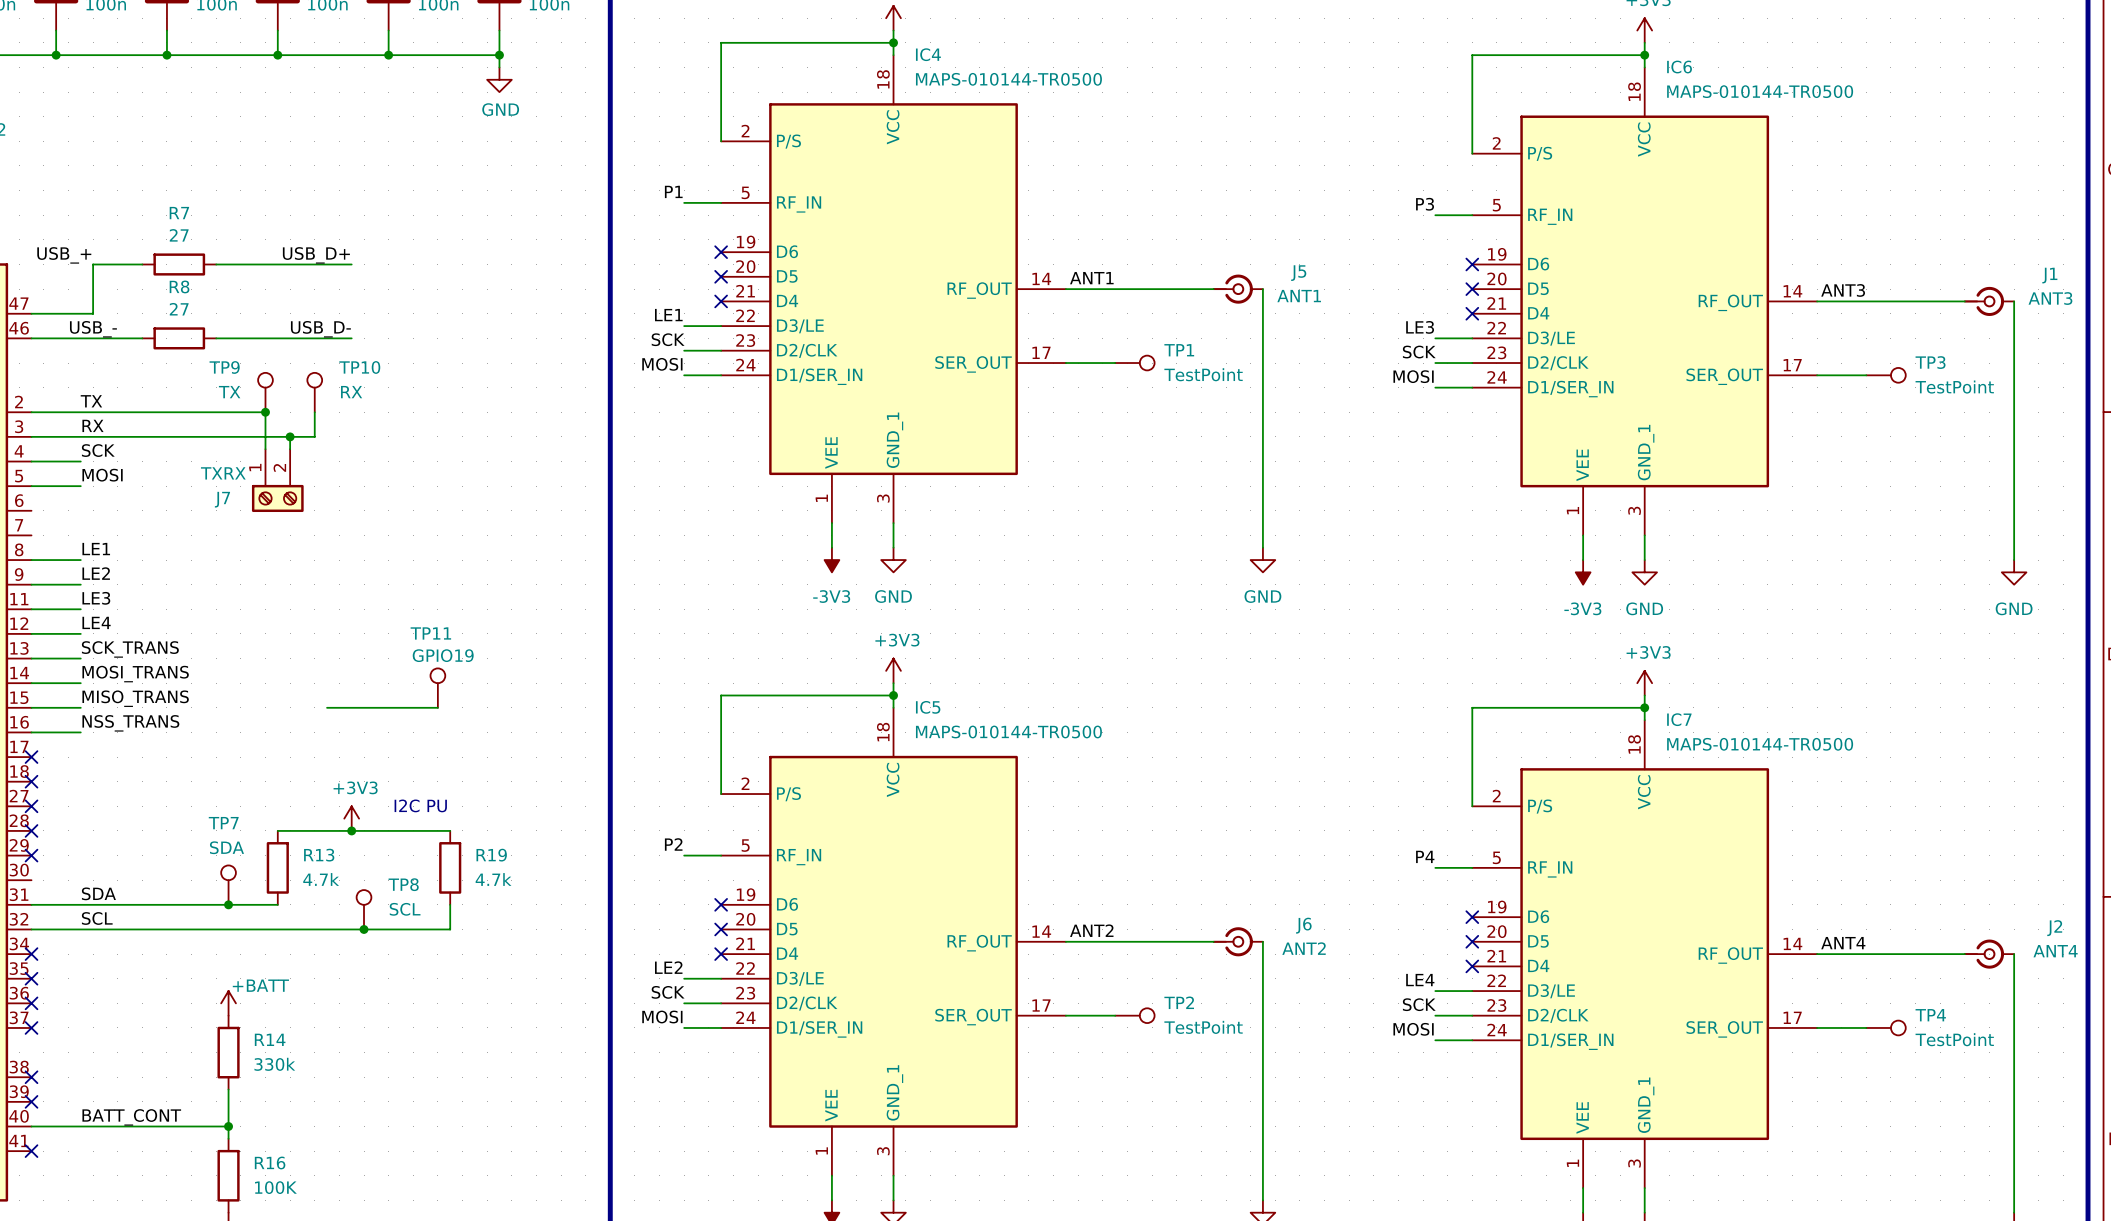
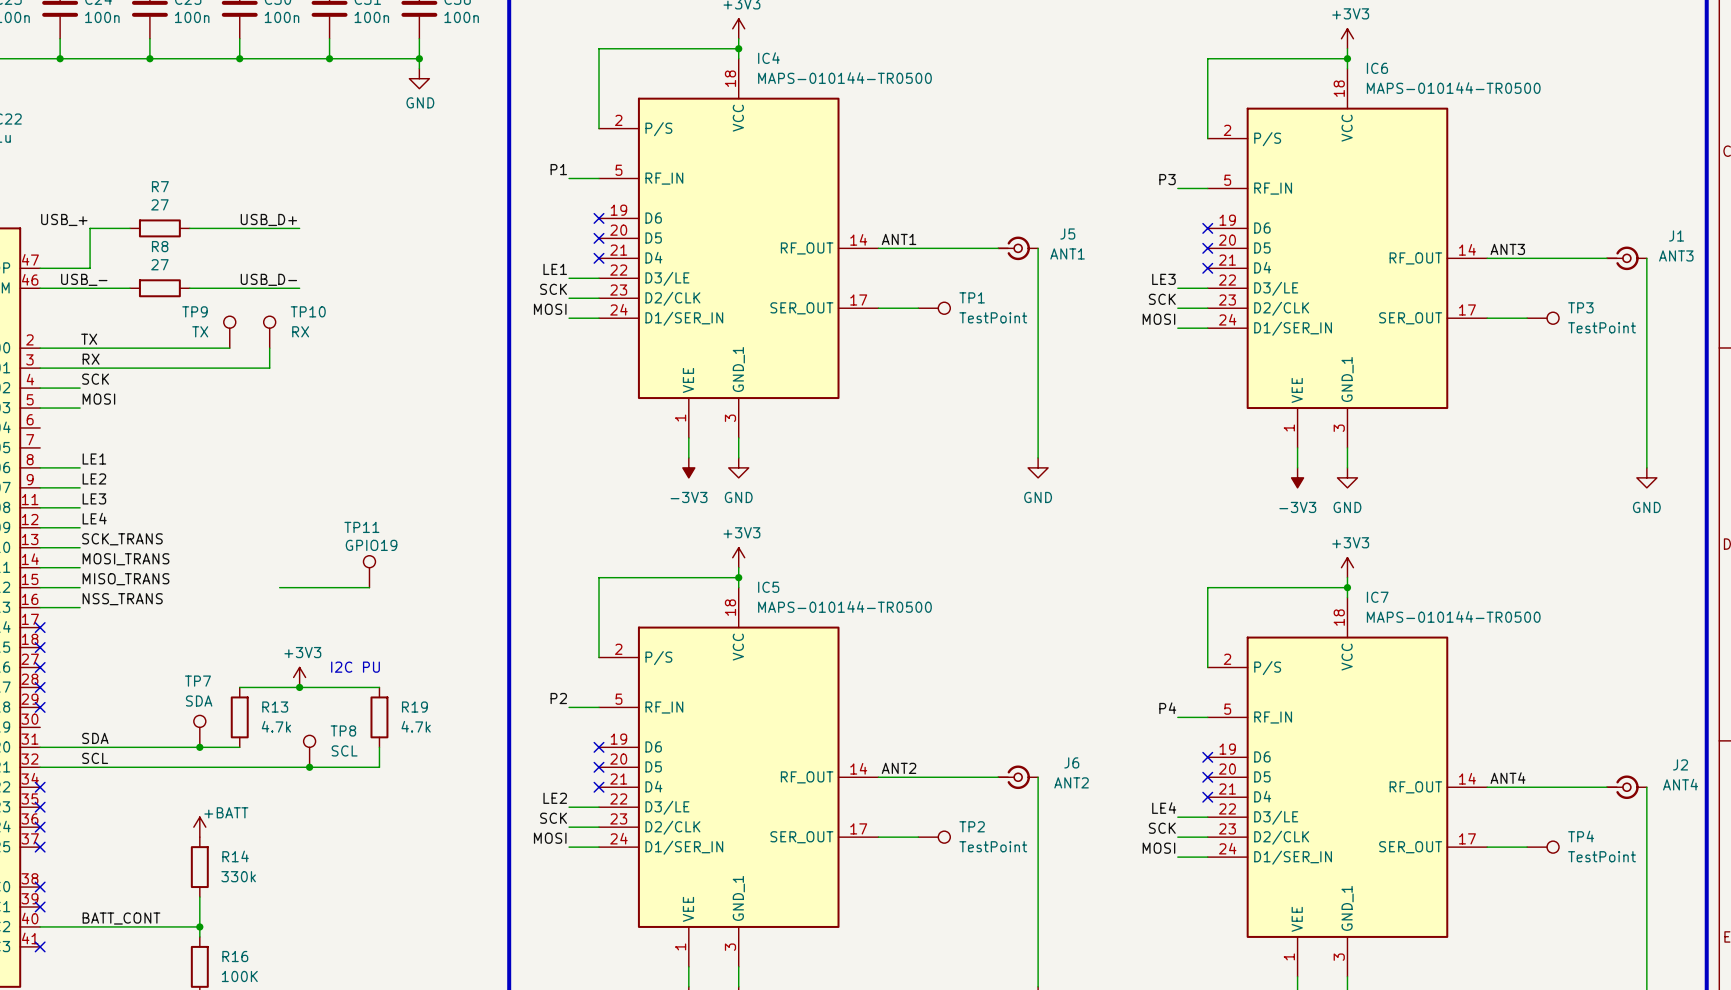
wire: (265, 412) (265, 449) -> none
junction: (265, 412) -> none
wire: (290, 436) (290, 449) -> none
junction: (290, 436) -> none
J7: TXRX (277, 480) -> none

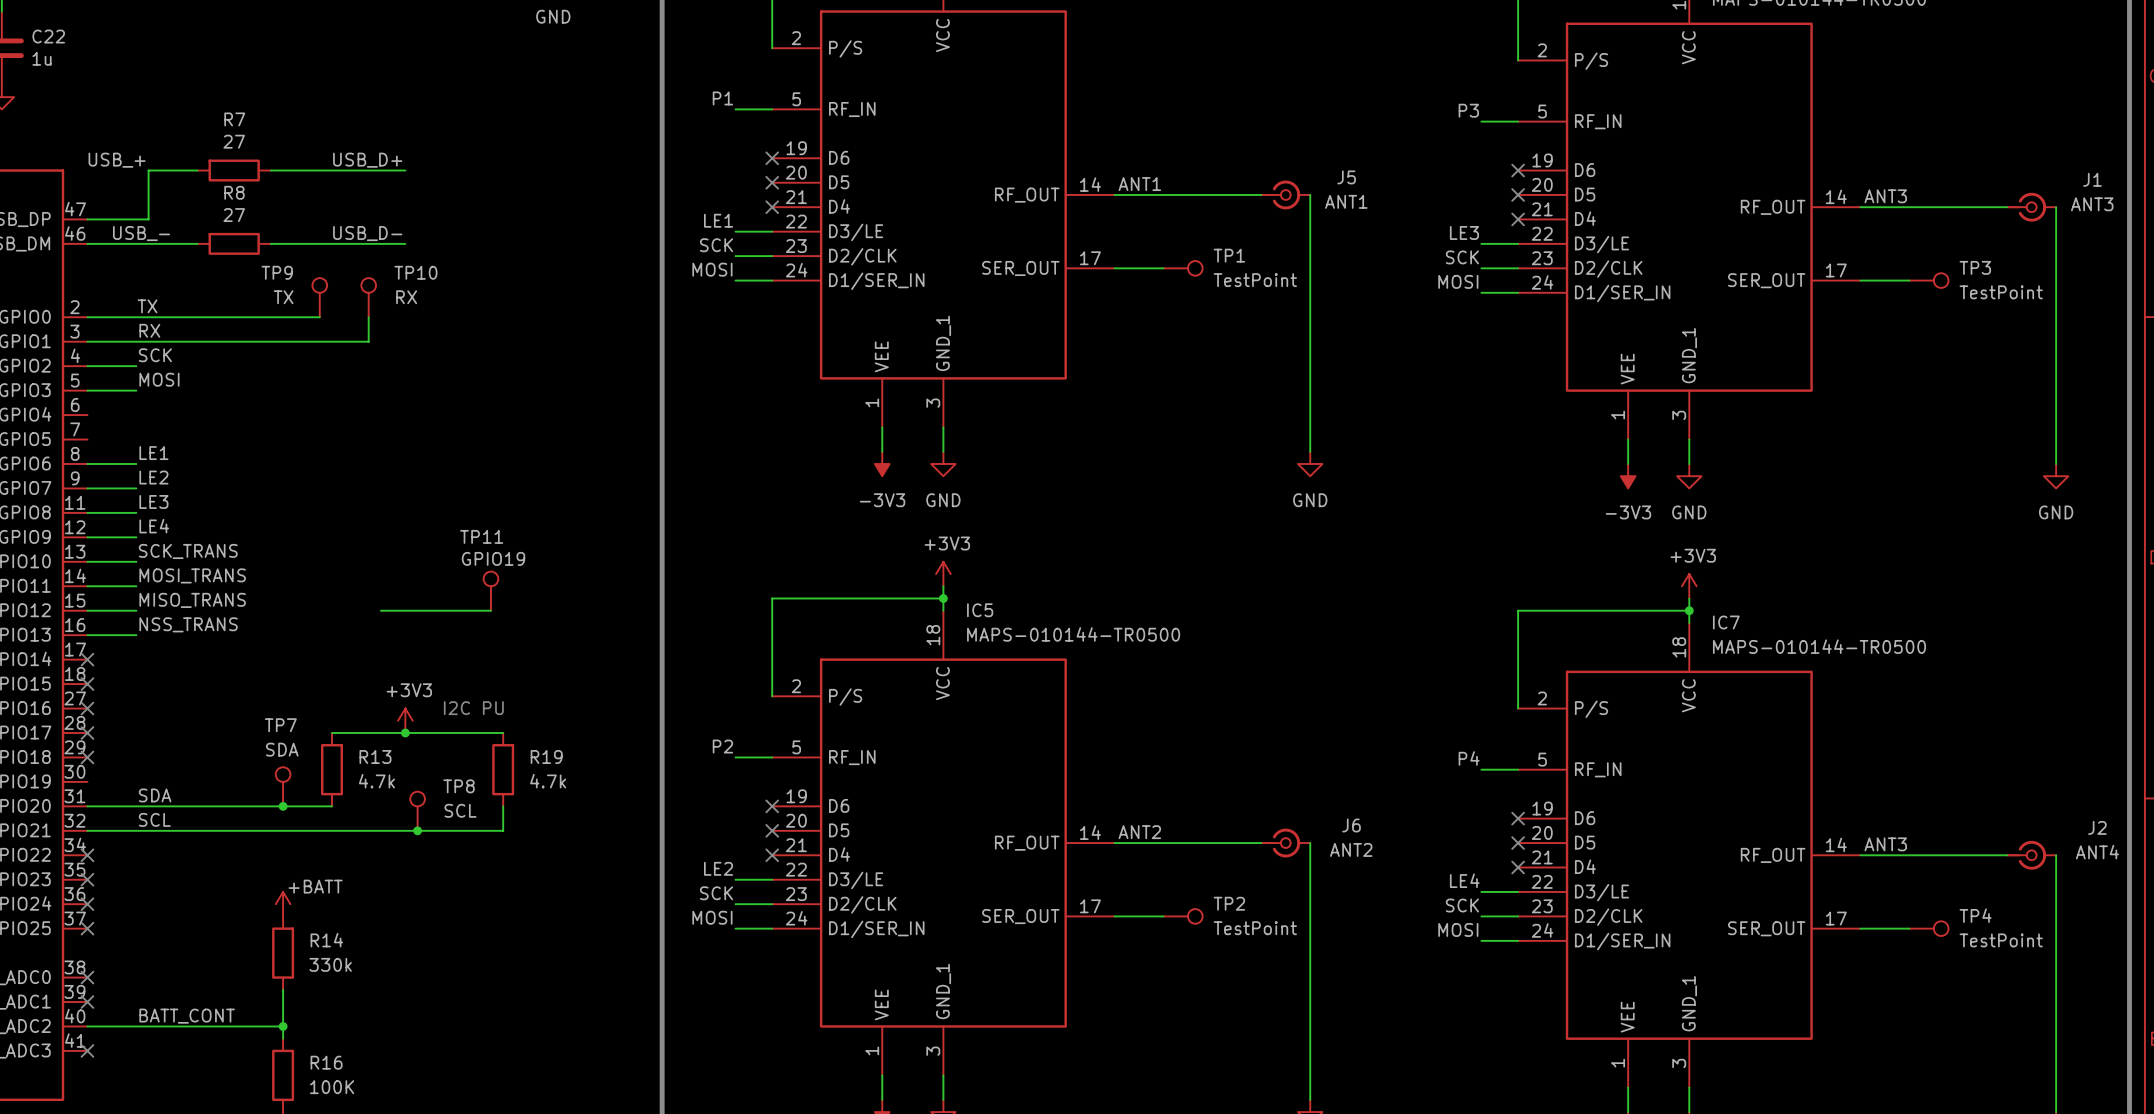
label: ANT4 (1508, 778) -> ANT3 (1885, 844)

